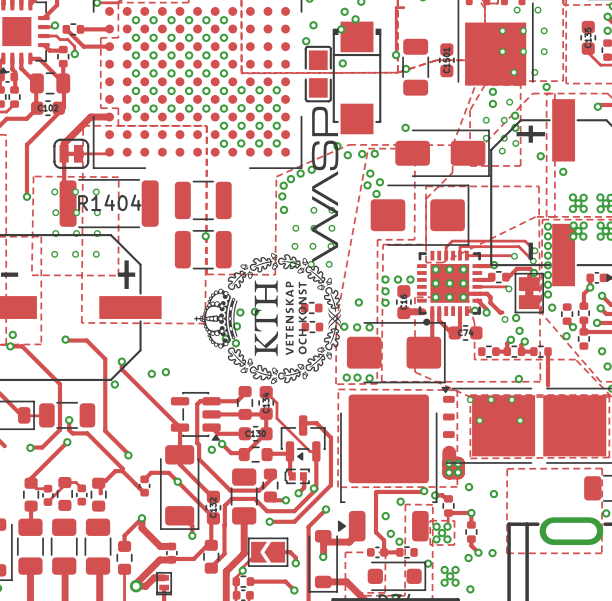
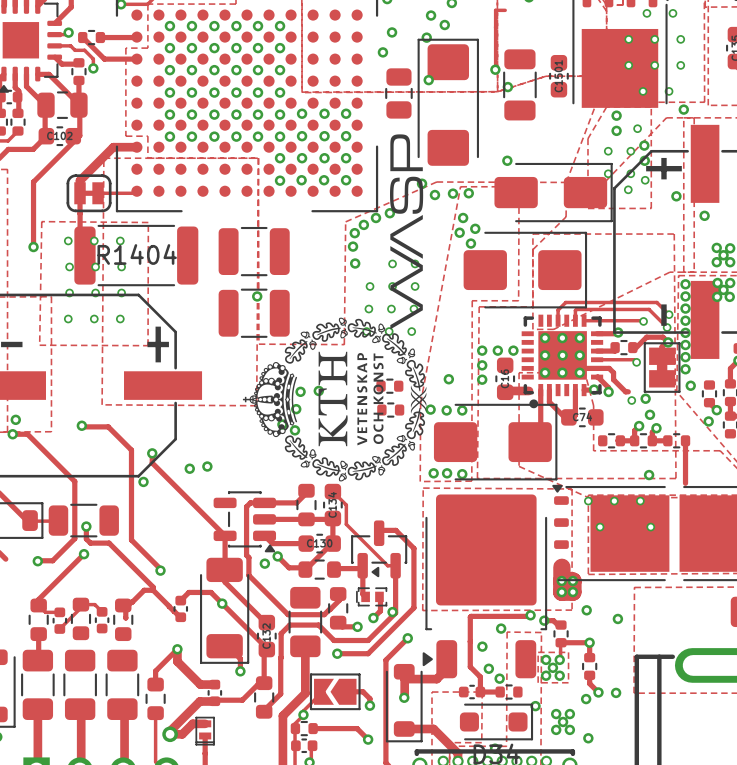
part footprint: [332, 21, 382, 135] -> [417, 38, 479, 166]
part footprint: [304, 45, 332, 103] -> [385, 68, 413, 119]

